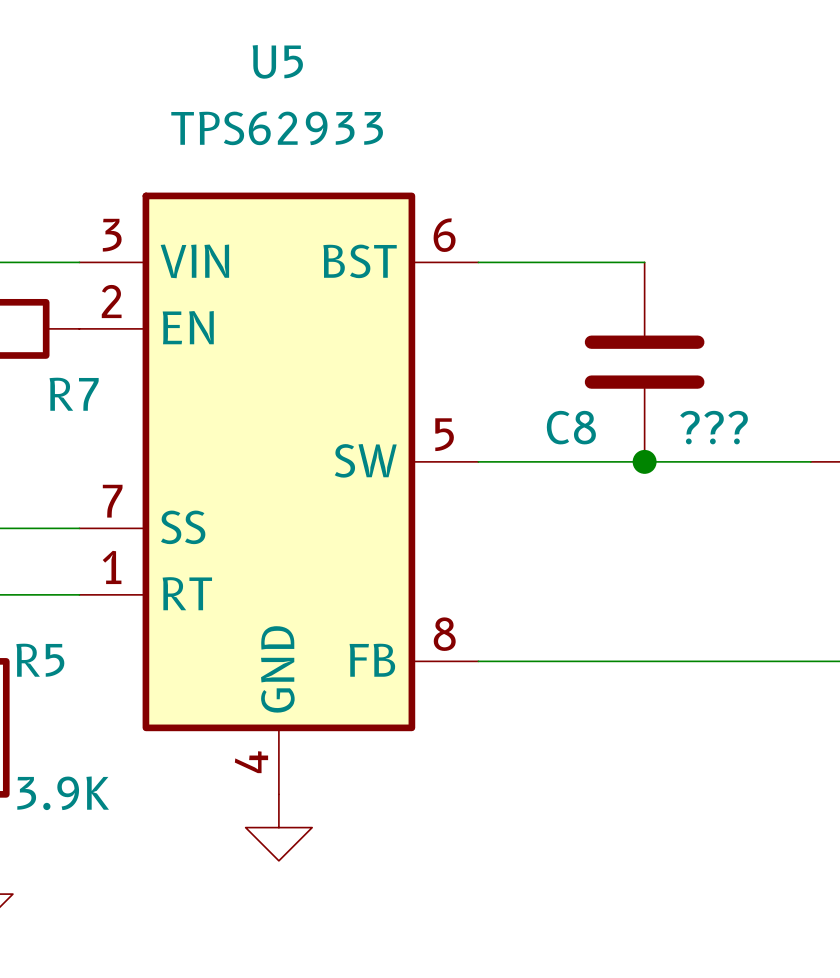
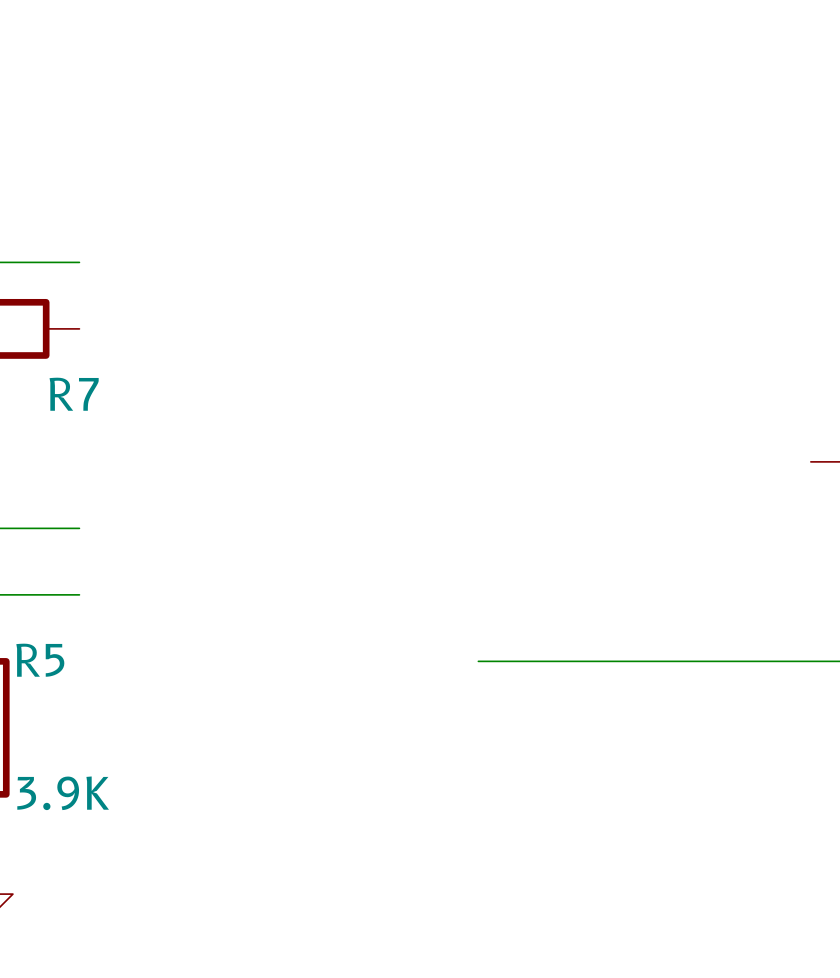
wire: (478, 262) (644, 262) -> none
C8: ??? (644, 362) -> none
wire: (478, 461) (810, 461) -> none
junction: (644, 461) -> none
U5: TPS62933 (278, 493) -> none
power symbol: (278, 827) -> none

